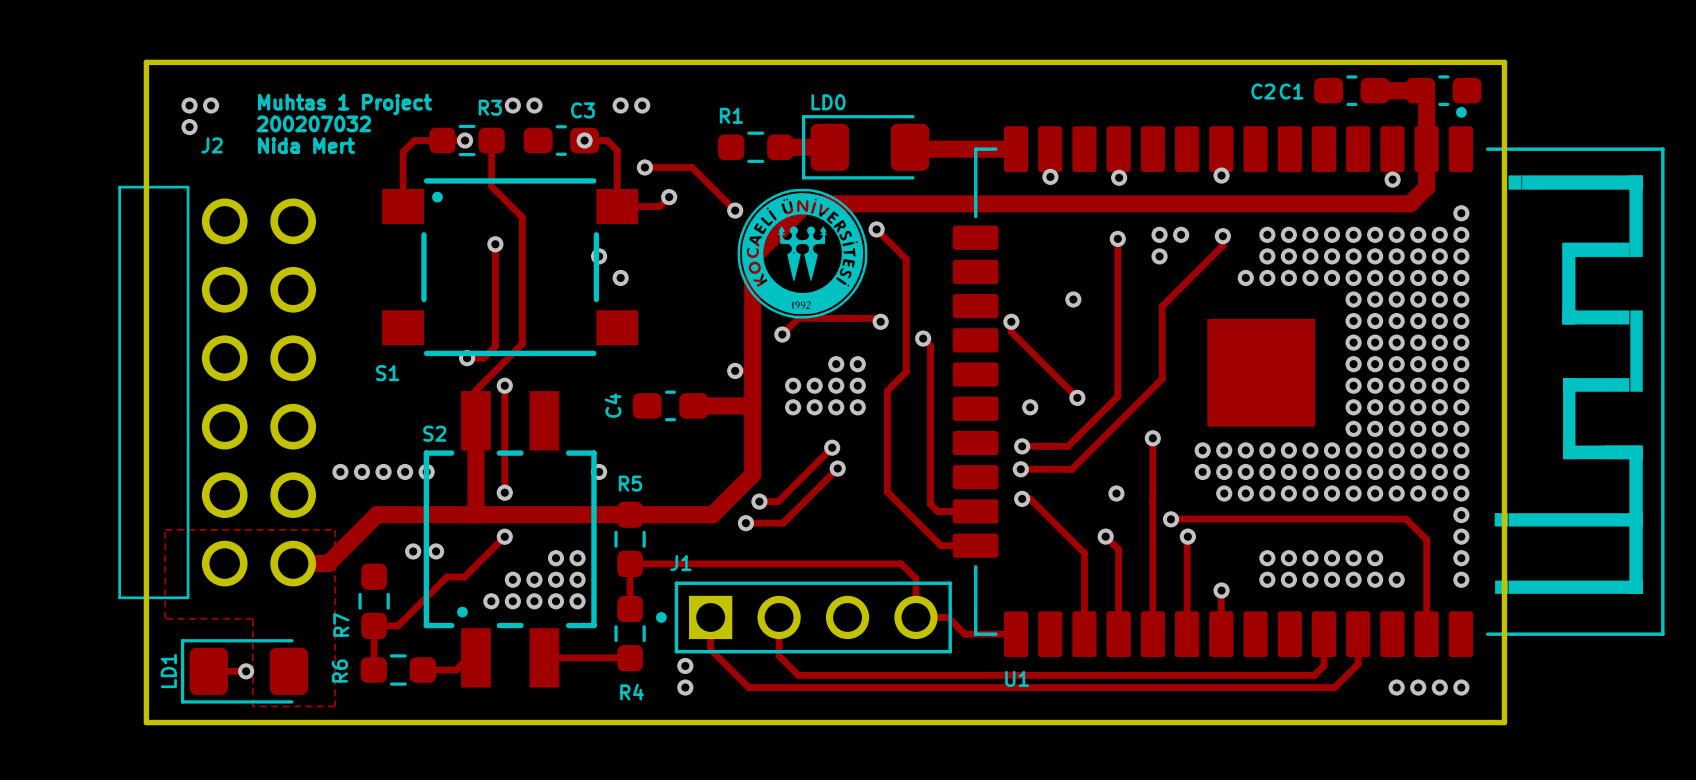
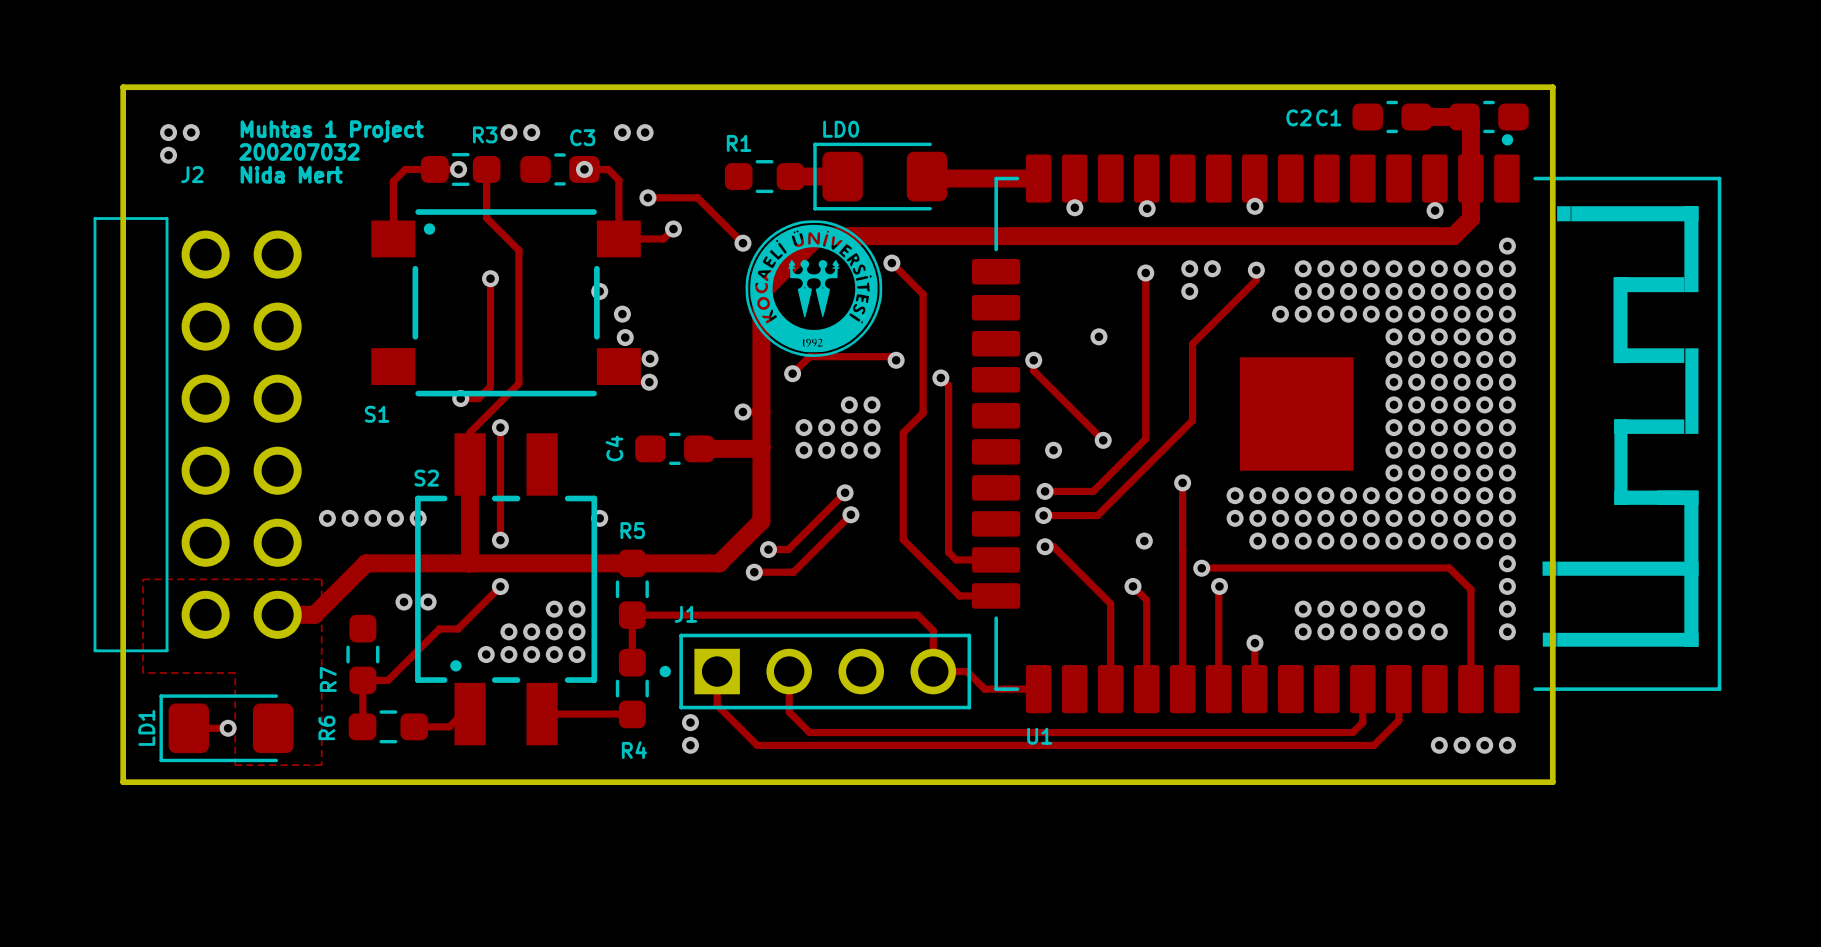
via: none -> (625, 337)
via: none -> (650, 358)
via: none -> (649, 382)

